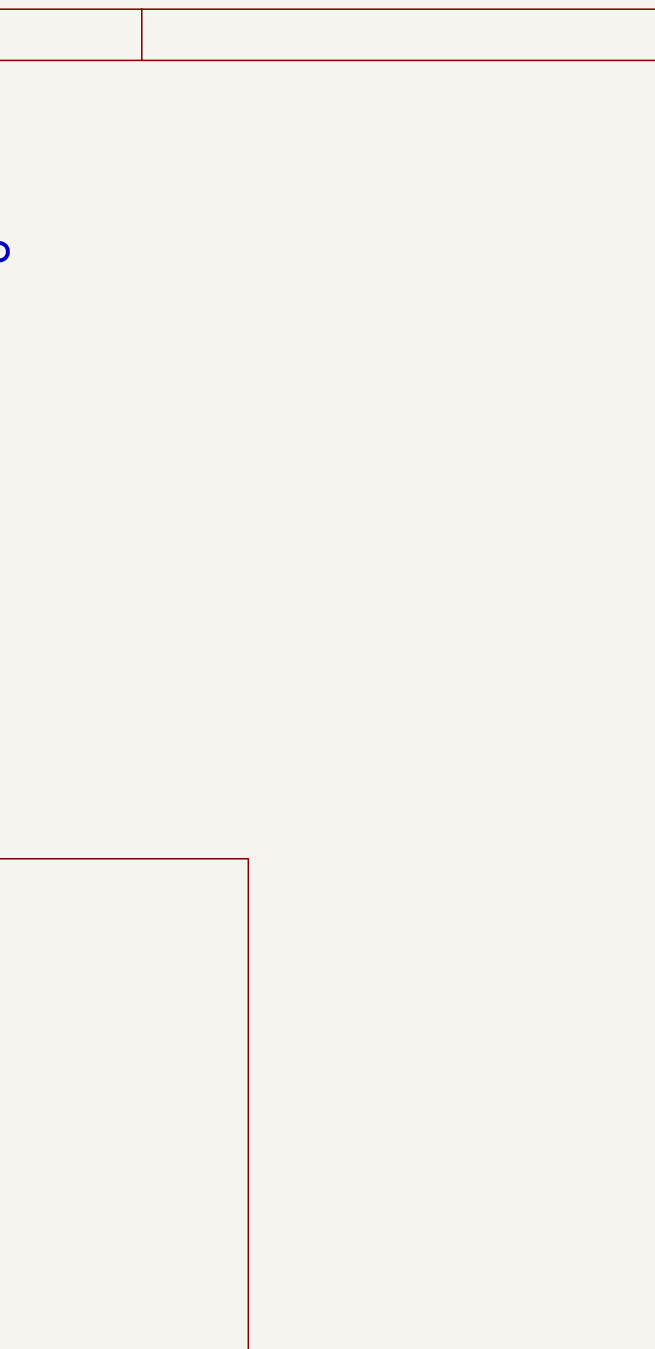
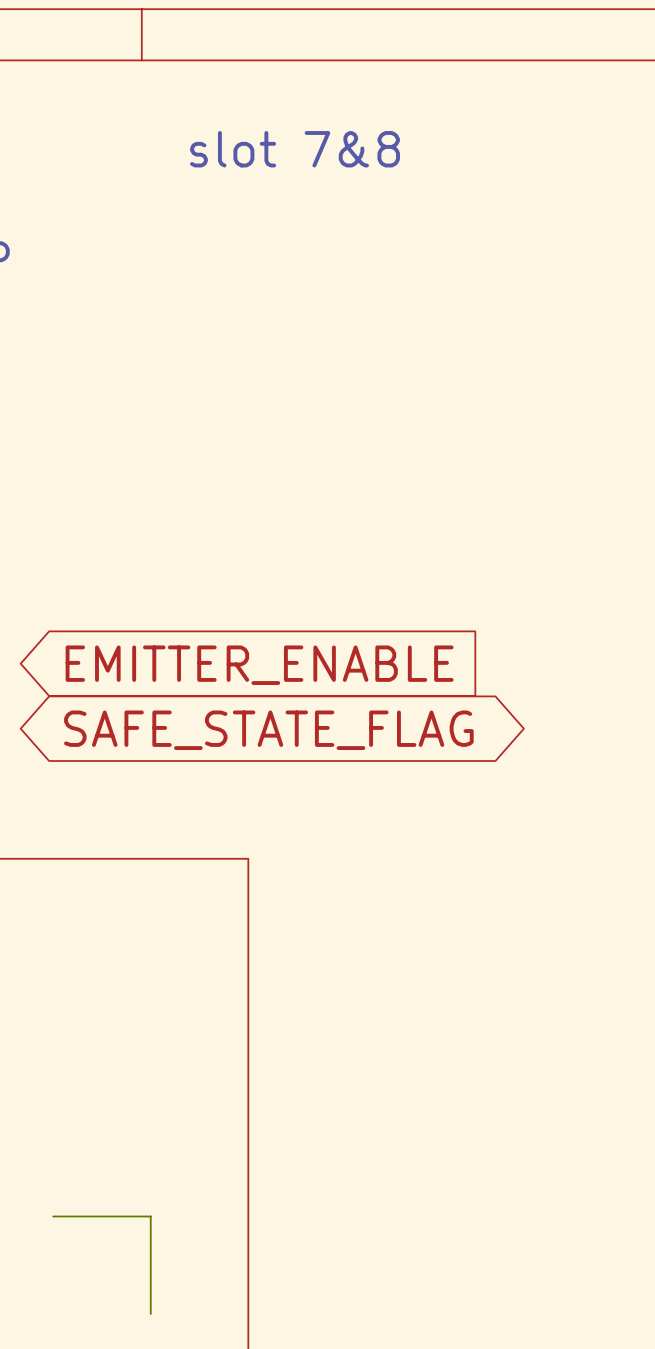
text: none -> slot 7&8 (295, 149)
global label: none -> EMITTER_ENABLE (259, 665)
global label: none -> SAFE_STATE_FLAG (268, 730)
wire: none -> (53, 1216) (150, 1216) (150, 1314)

